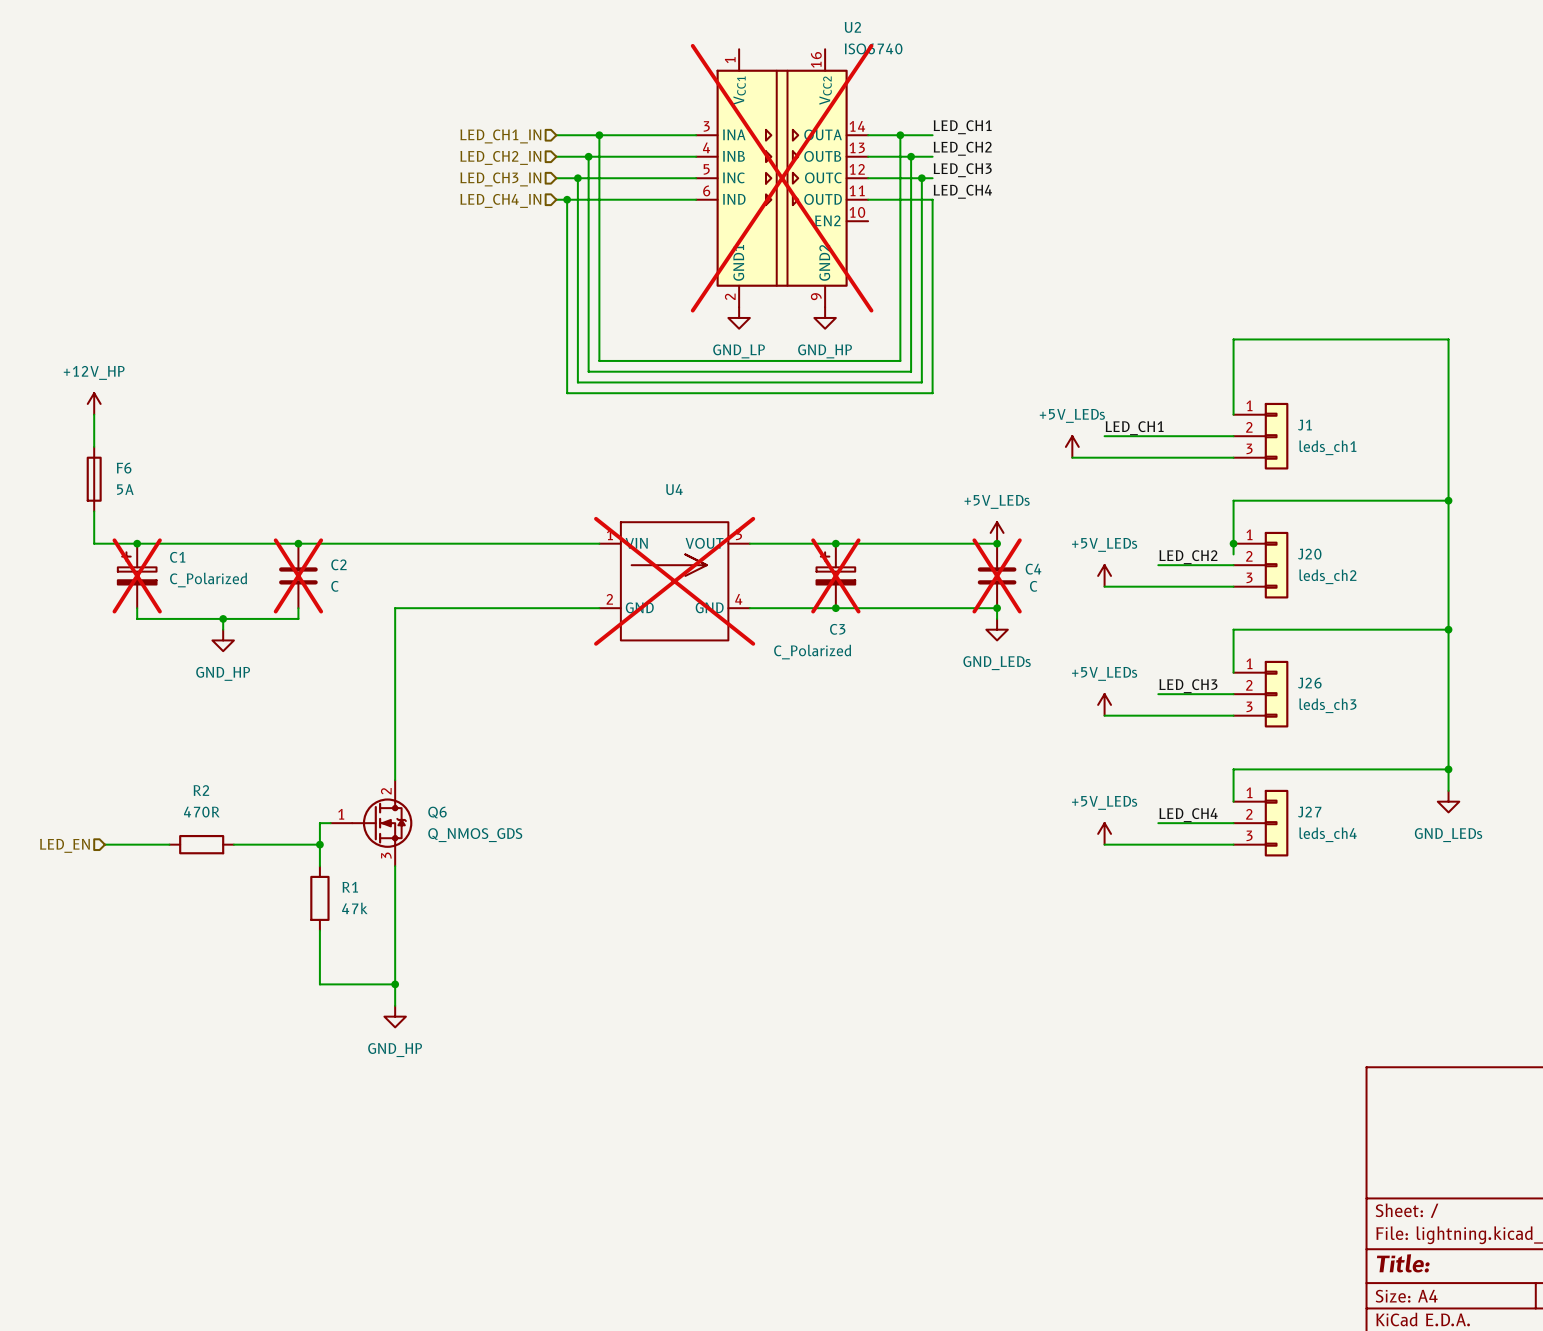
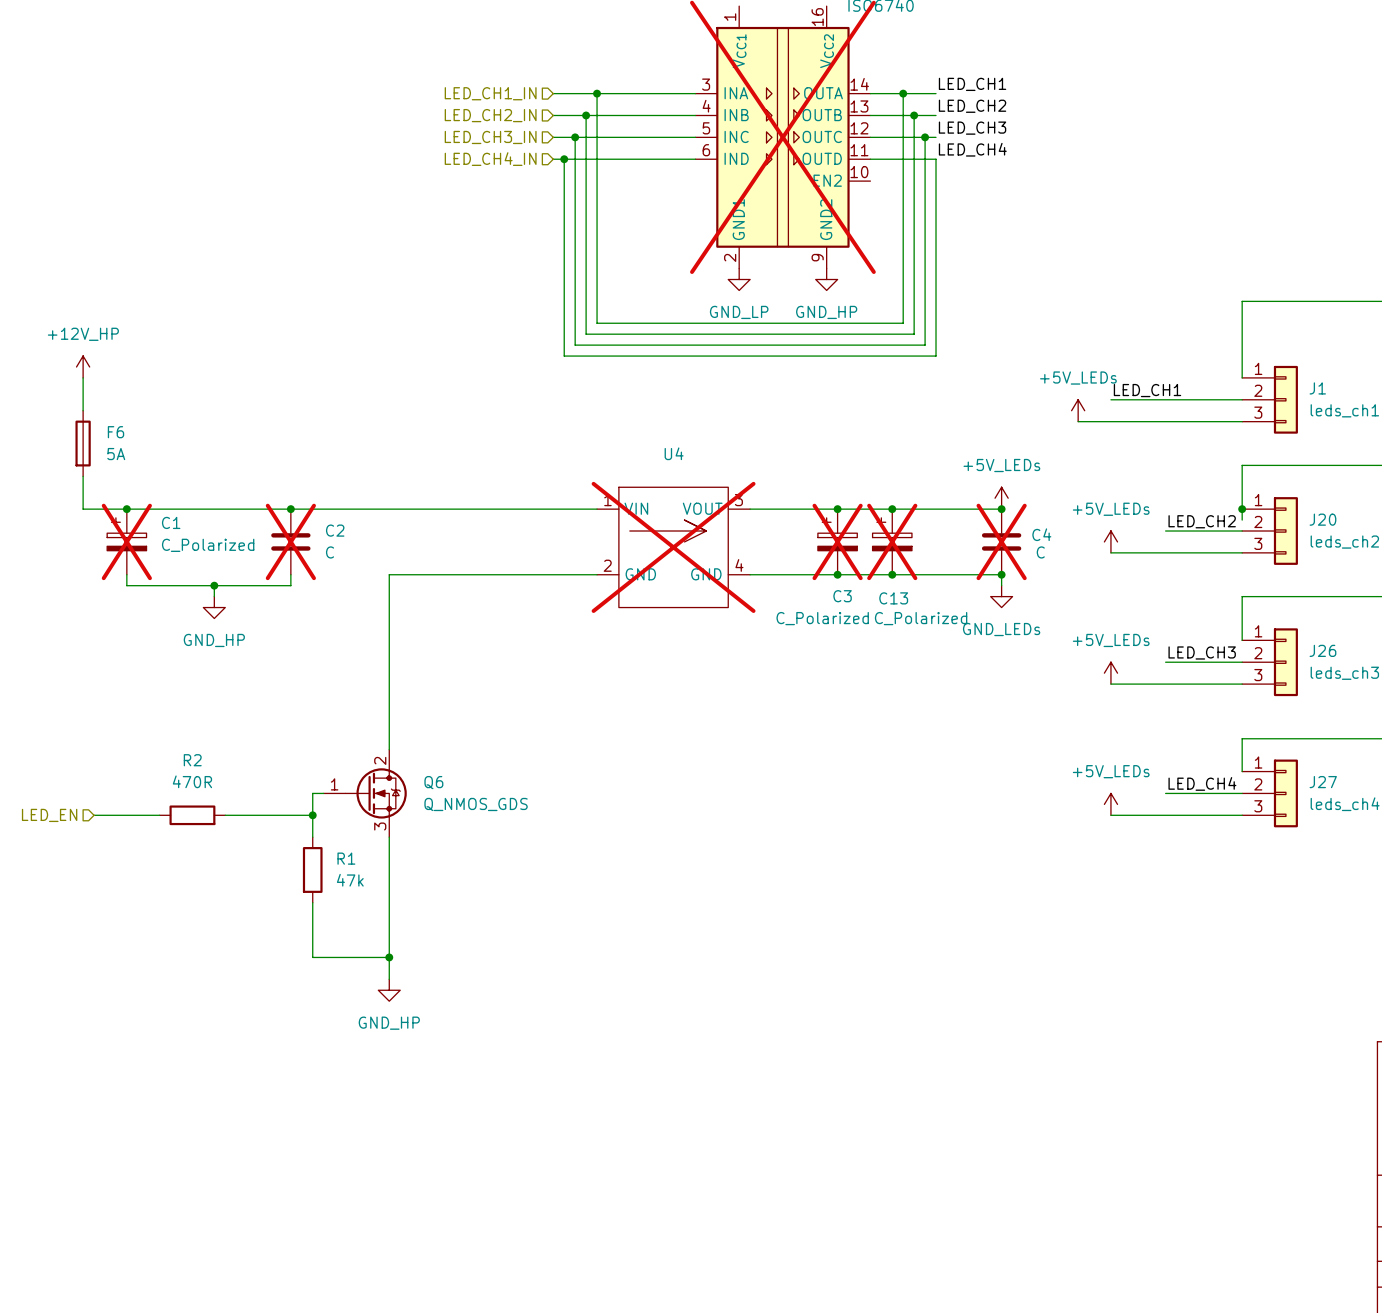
junction: none -> (892, 509)
C13: none -> C_Polarized (892, 541)
junction: none -> (892, 574)

